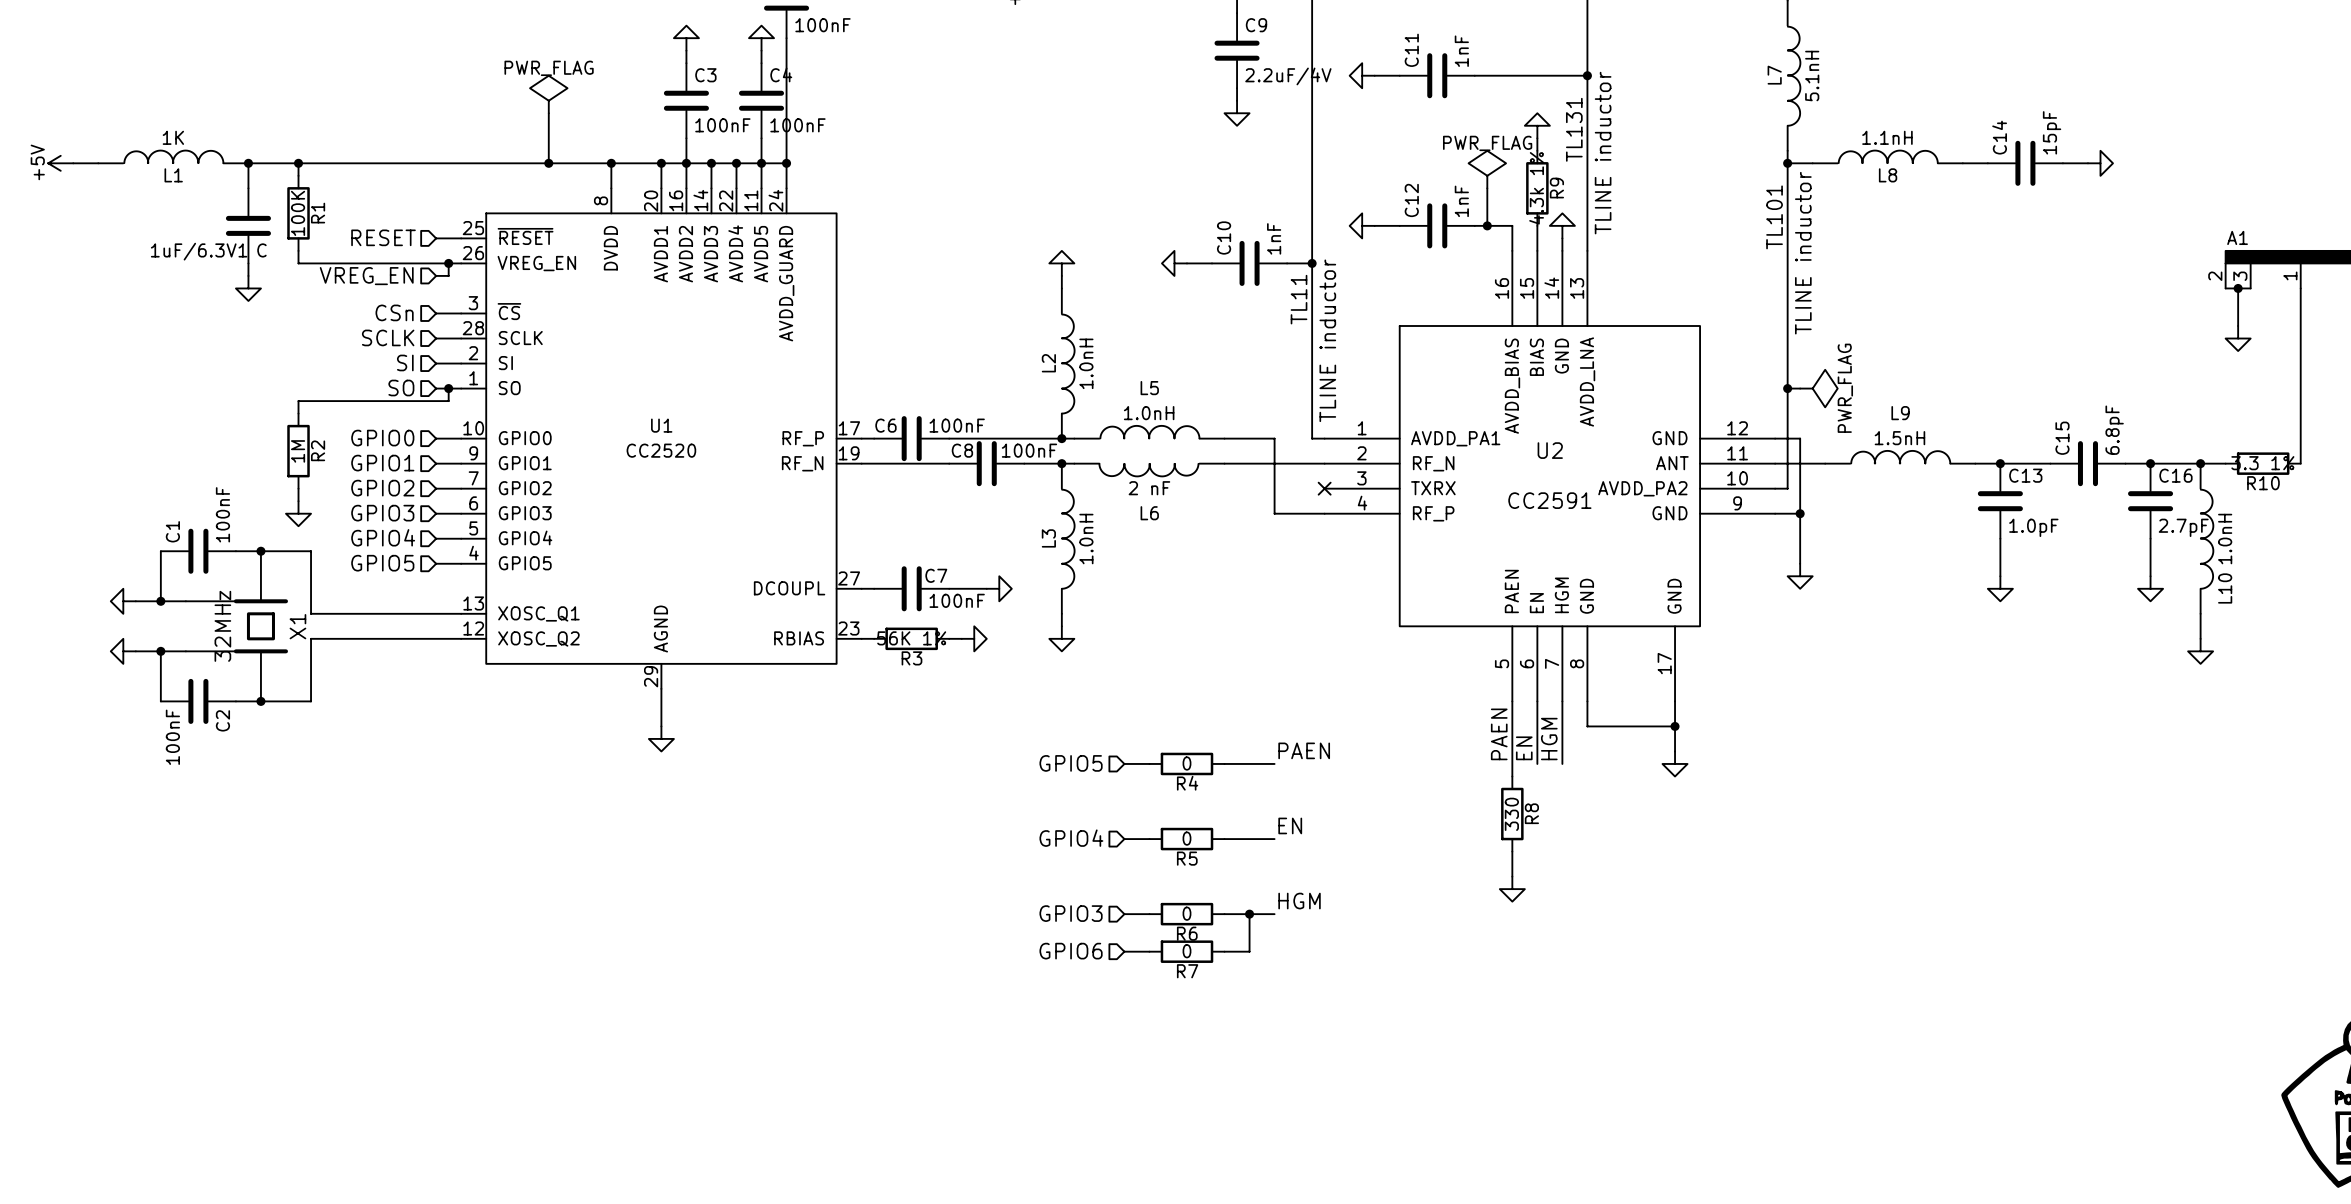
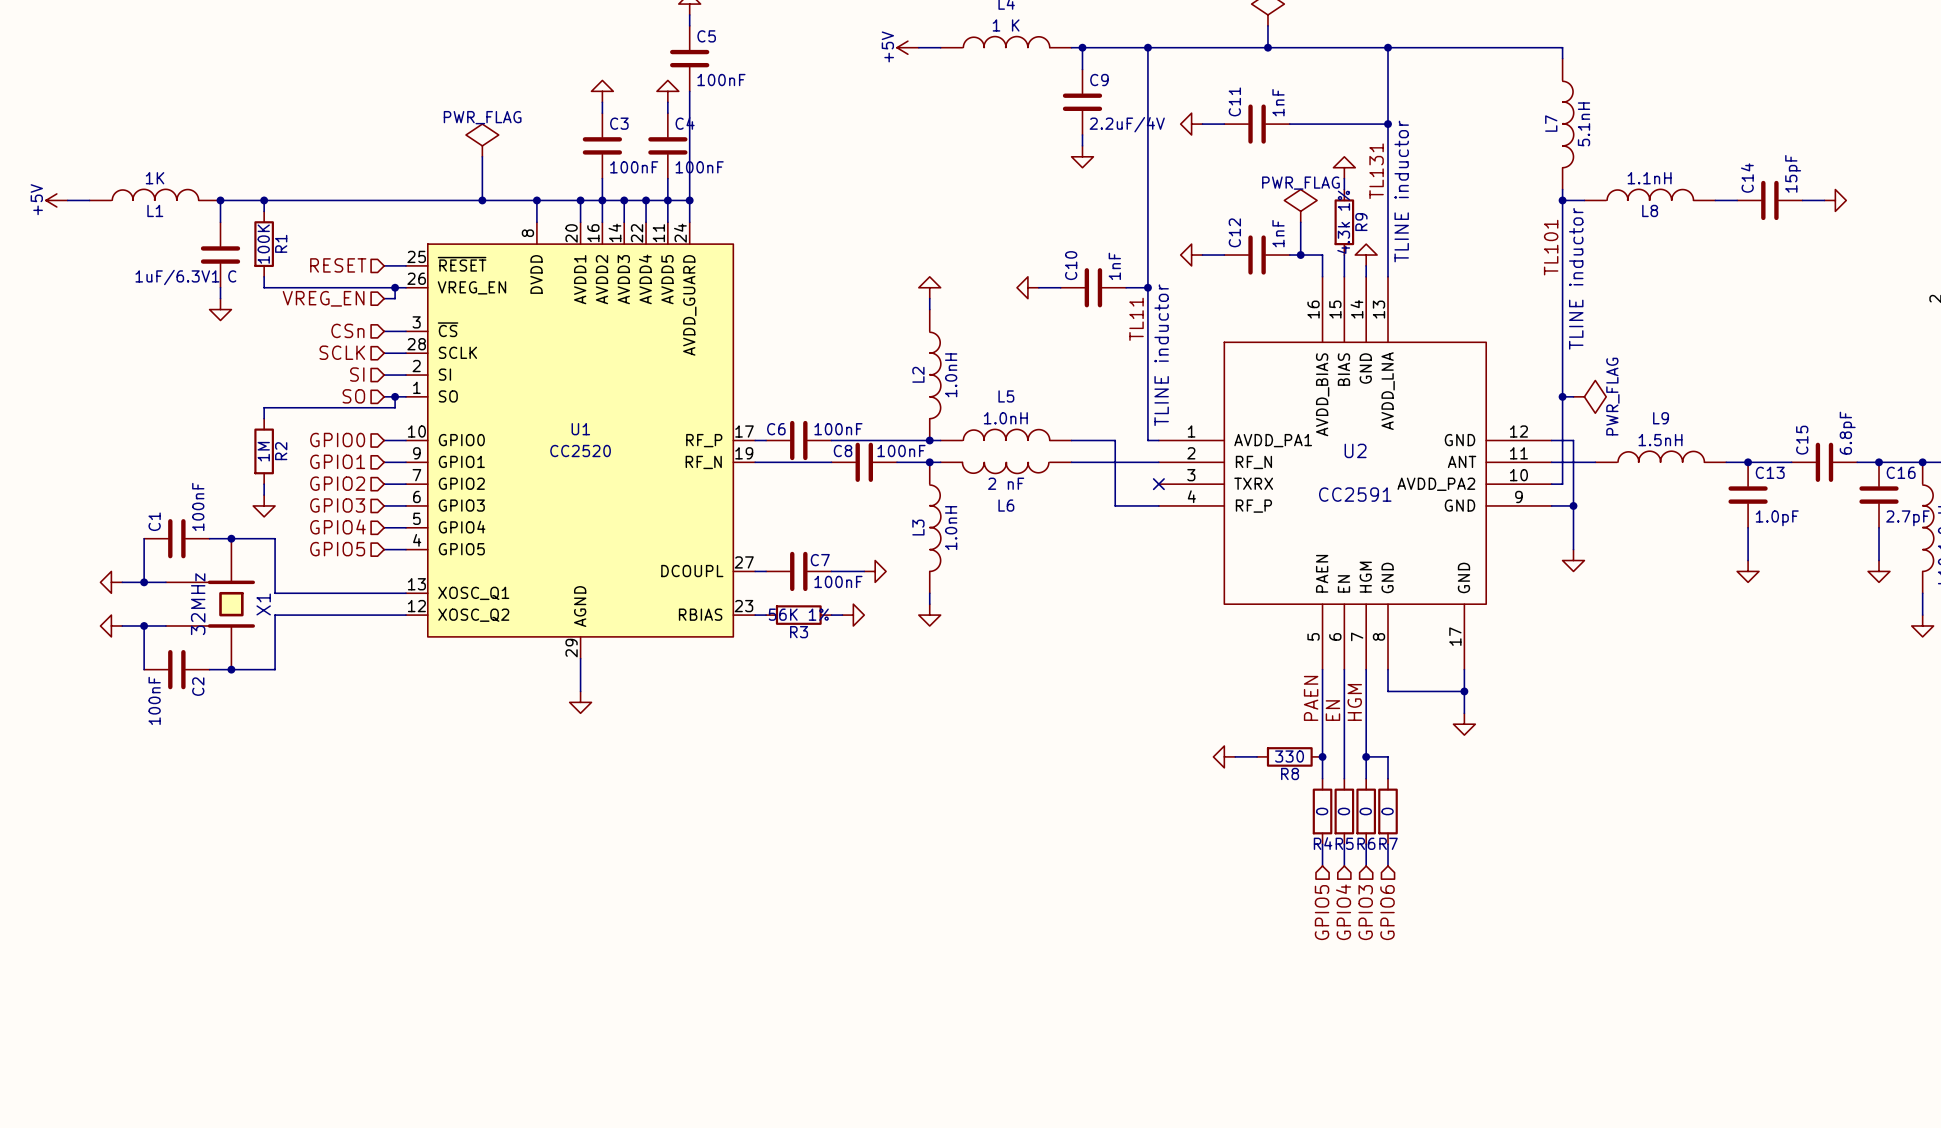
label: PAEN (1304, 750) -> none
hierarchical label: GPIO5 (1071, 763) -> none
wire: (1124, 763) (1149, 763) -> none
R4 rotation: 0° (1186, 763) -> 90° clockwise (1322, 811)
R4 position: (1186, 763) -> (1322, 811)
wire: (1224, 763) (1274, 763) -> none
wire: none -> (1344, 724) (1344, 778)
wire: none -> (1366, 724) (1366, 778)
wire: none -> (1322, 735) (1322, 778)
wire: none -> (1235, 756) (1257, 756)
junction: none -> (1322, 756)
wire: none -> (1366, 756) (1388, 756) (1388, 778)
junction: none -> (1366, 756)
R8 rotation: 0° (1512, 814) -> 90° clockwise (1289, 756)
label: EN (1290, 825) -> none
hierarchical label: GPIO4 (1071, 838) -> none
wire: (1124, 839) (1149, 839) -> none
R5 rotation: 0° (1186, 839) -> 90° clockwise (1344, 811)
R5 position: (1186, 839) -> (1344, 811)
wire: (1224, 839) (1274, 839) -> none
wire: (1512, 851) (1512, 876) -> (1322, 844) (1322, 866)
power symbol rotation: 0° (1512, 889) -> 90° clockwise (1224, 756)
power symbol position: (1512, 889) -> (1224, 756)
label: HGM (1299, 901) -> none
wire: none -> (1344, 844) (1344, 866)
wire: none -> (1366, 844) (1366, 866)
wire: none -> (1388, 844) (1388, 866)
hierarchical label: GPIO3 (1071, 913) -> none
wire: (1124, 914) (1149, 914) -> none
R6 rotation: 0° (1186, 914) -> 90° clockwise (1366, 811)
R6 position: (1186, 914) -> (1366, 811)
wire: (1224, 914) (1274, 914) -> none
wire: (1249, 914) (1249, 951) (1224, 951) -> none
junction: (1249, 914) -> none
hierarchical label: GPIO6 (1071, 951) -> none
wire: (1124, 951) (1149, 951) -> none
R7 rotation: 0° (1186, 951) -> 90° clockwise (1388, 811)
R7 position: (1186, 951) -> (1388, 811)
hierarchical label: none -> GPIO4 (1343, 912)
hierarchical label: none -> GPIO5 (1322, 912)
hierarchical label: none -> GPIO3 (1365, 912)
hierarchical label: none -> GPIO6 (1387, 912)

